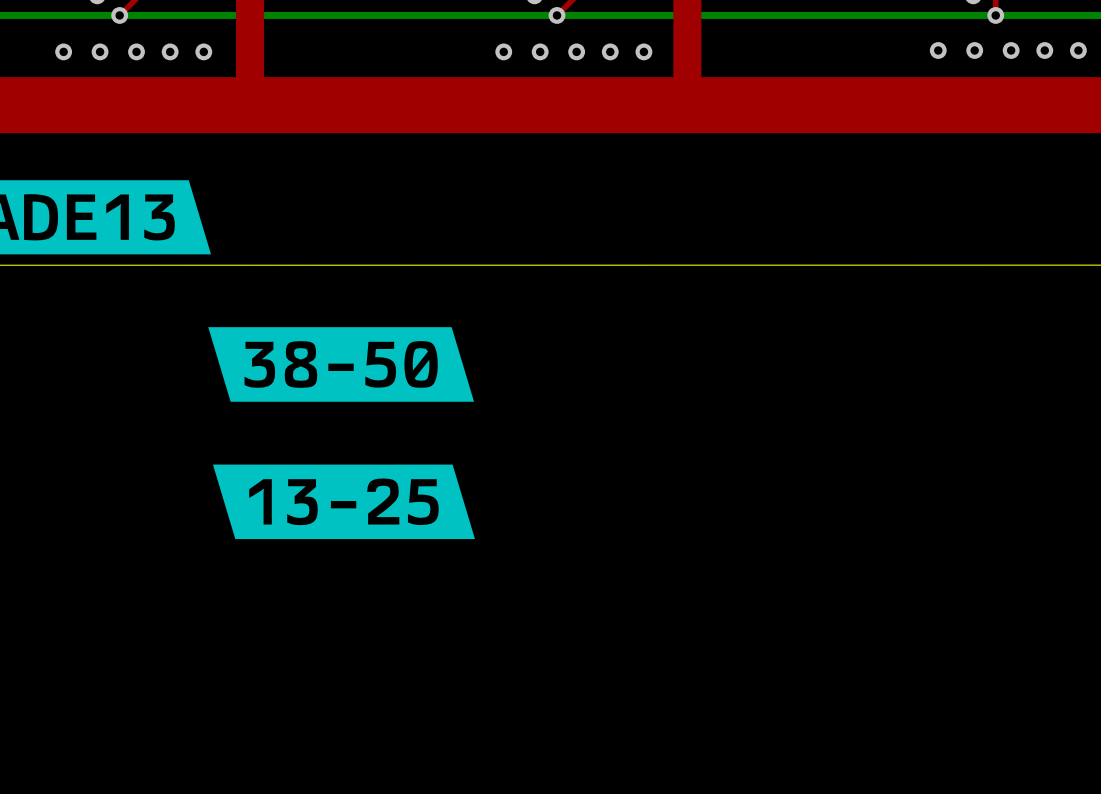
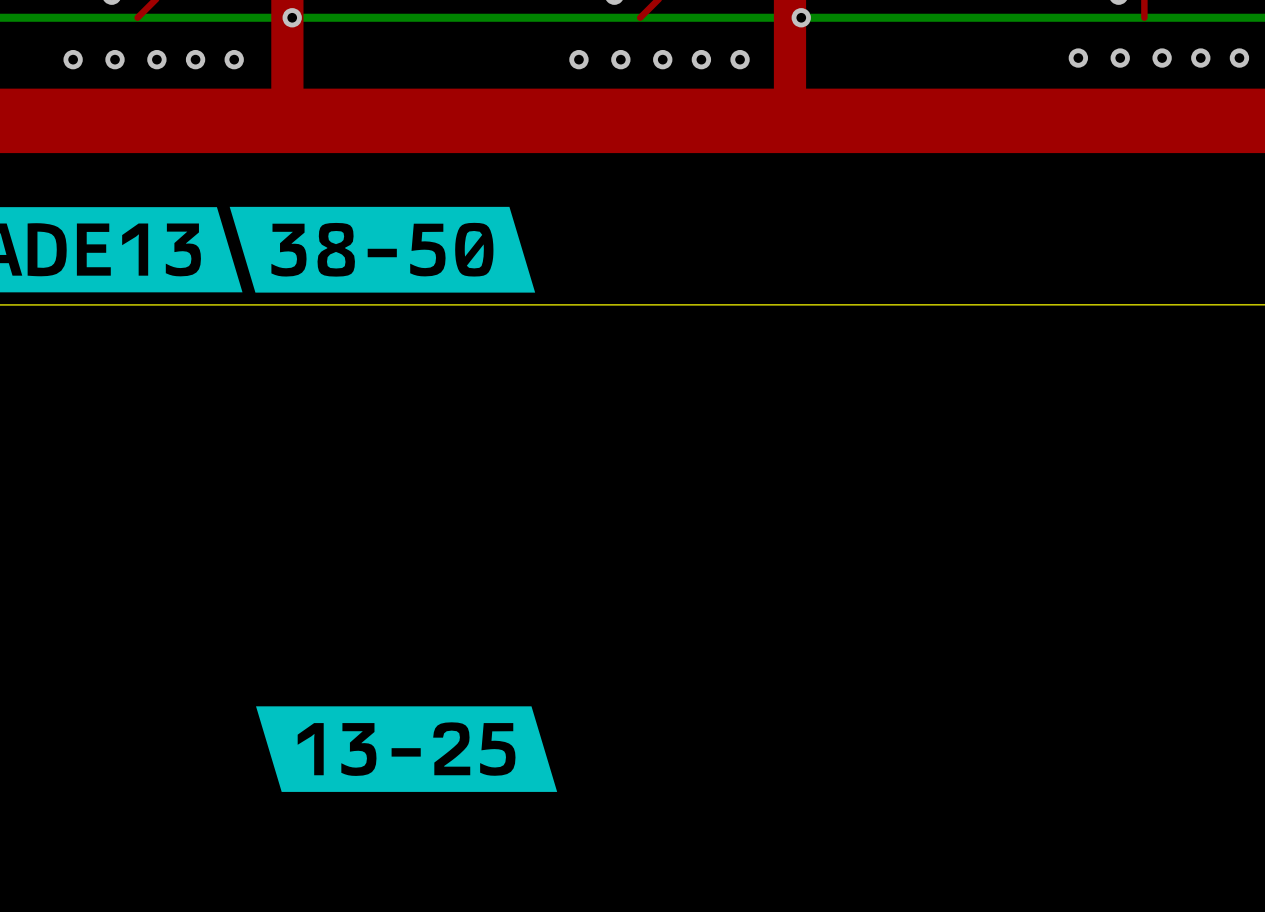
via: (119, 15) -> none
via: none -> (292, 17)
via: (557, 15) -> none
via: none -> (801, 17)
via: (995, 15) -> none
drawing position: (341, 364) -> (382, 249)
drawing position: (343, 501) -> (406, 749)

